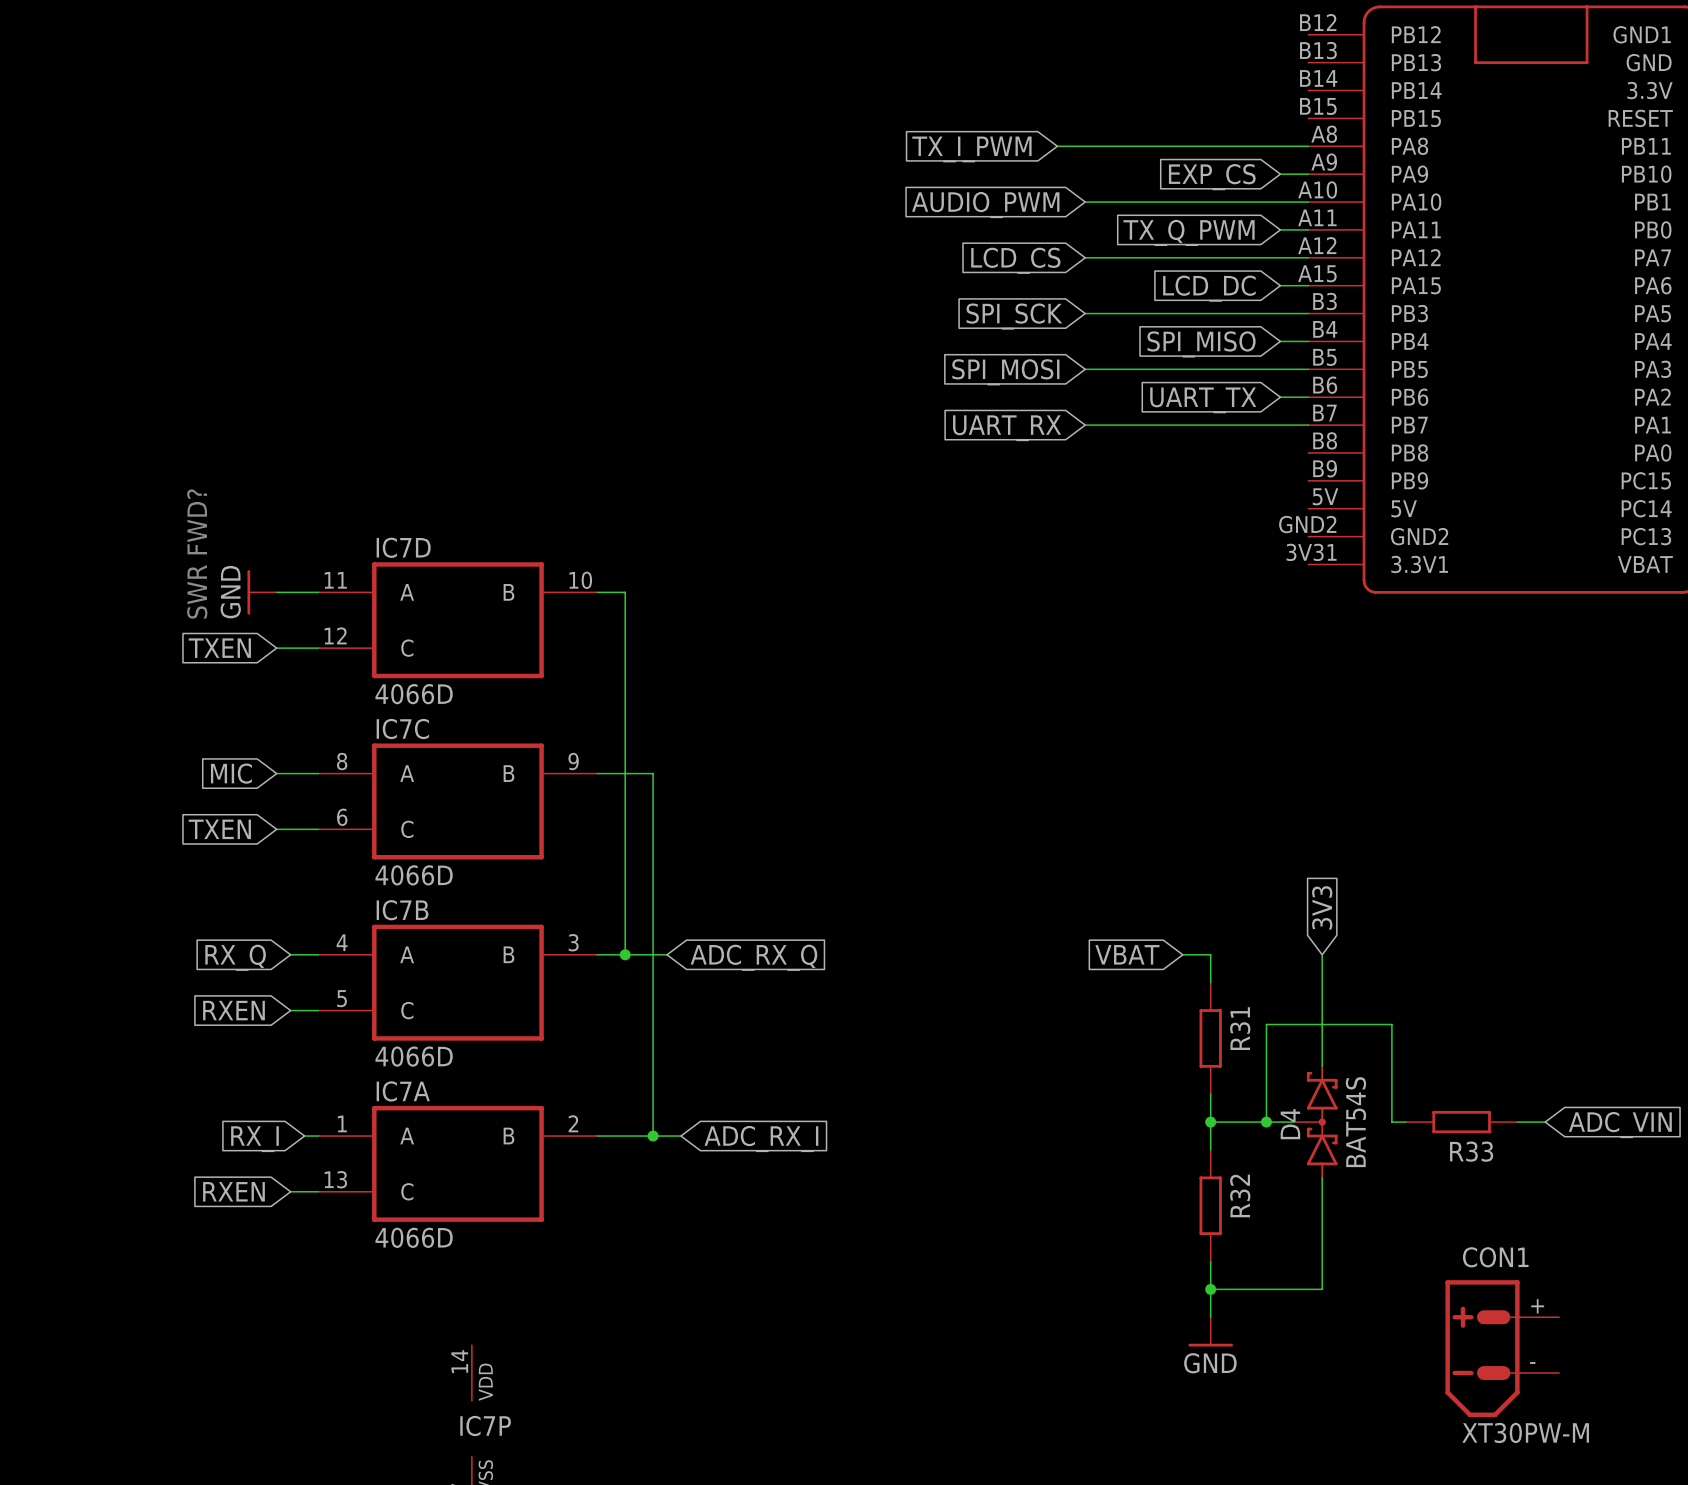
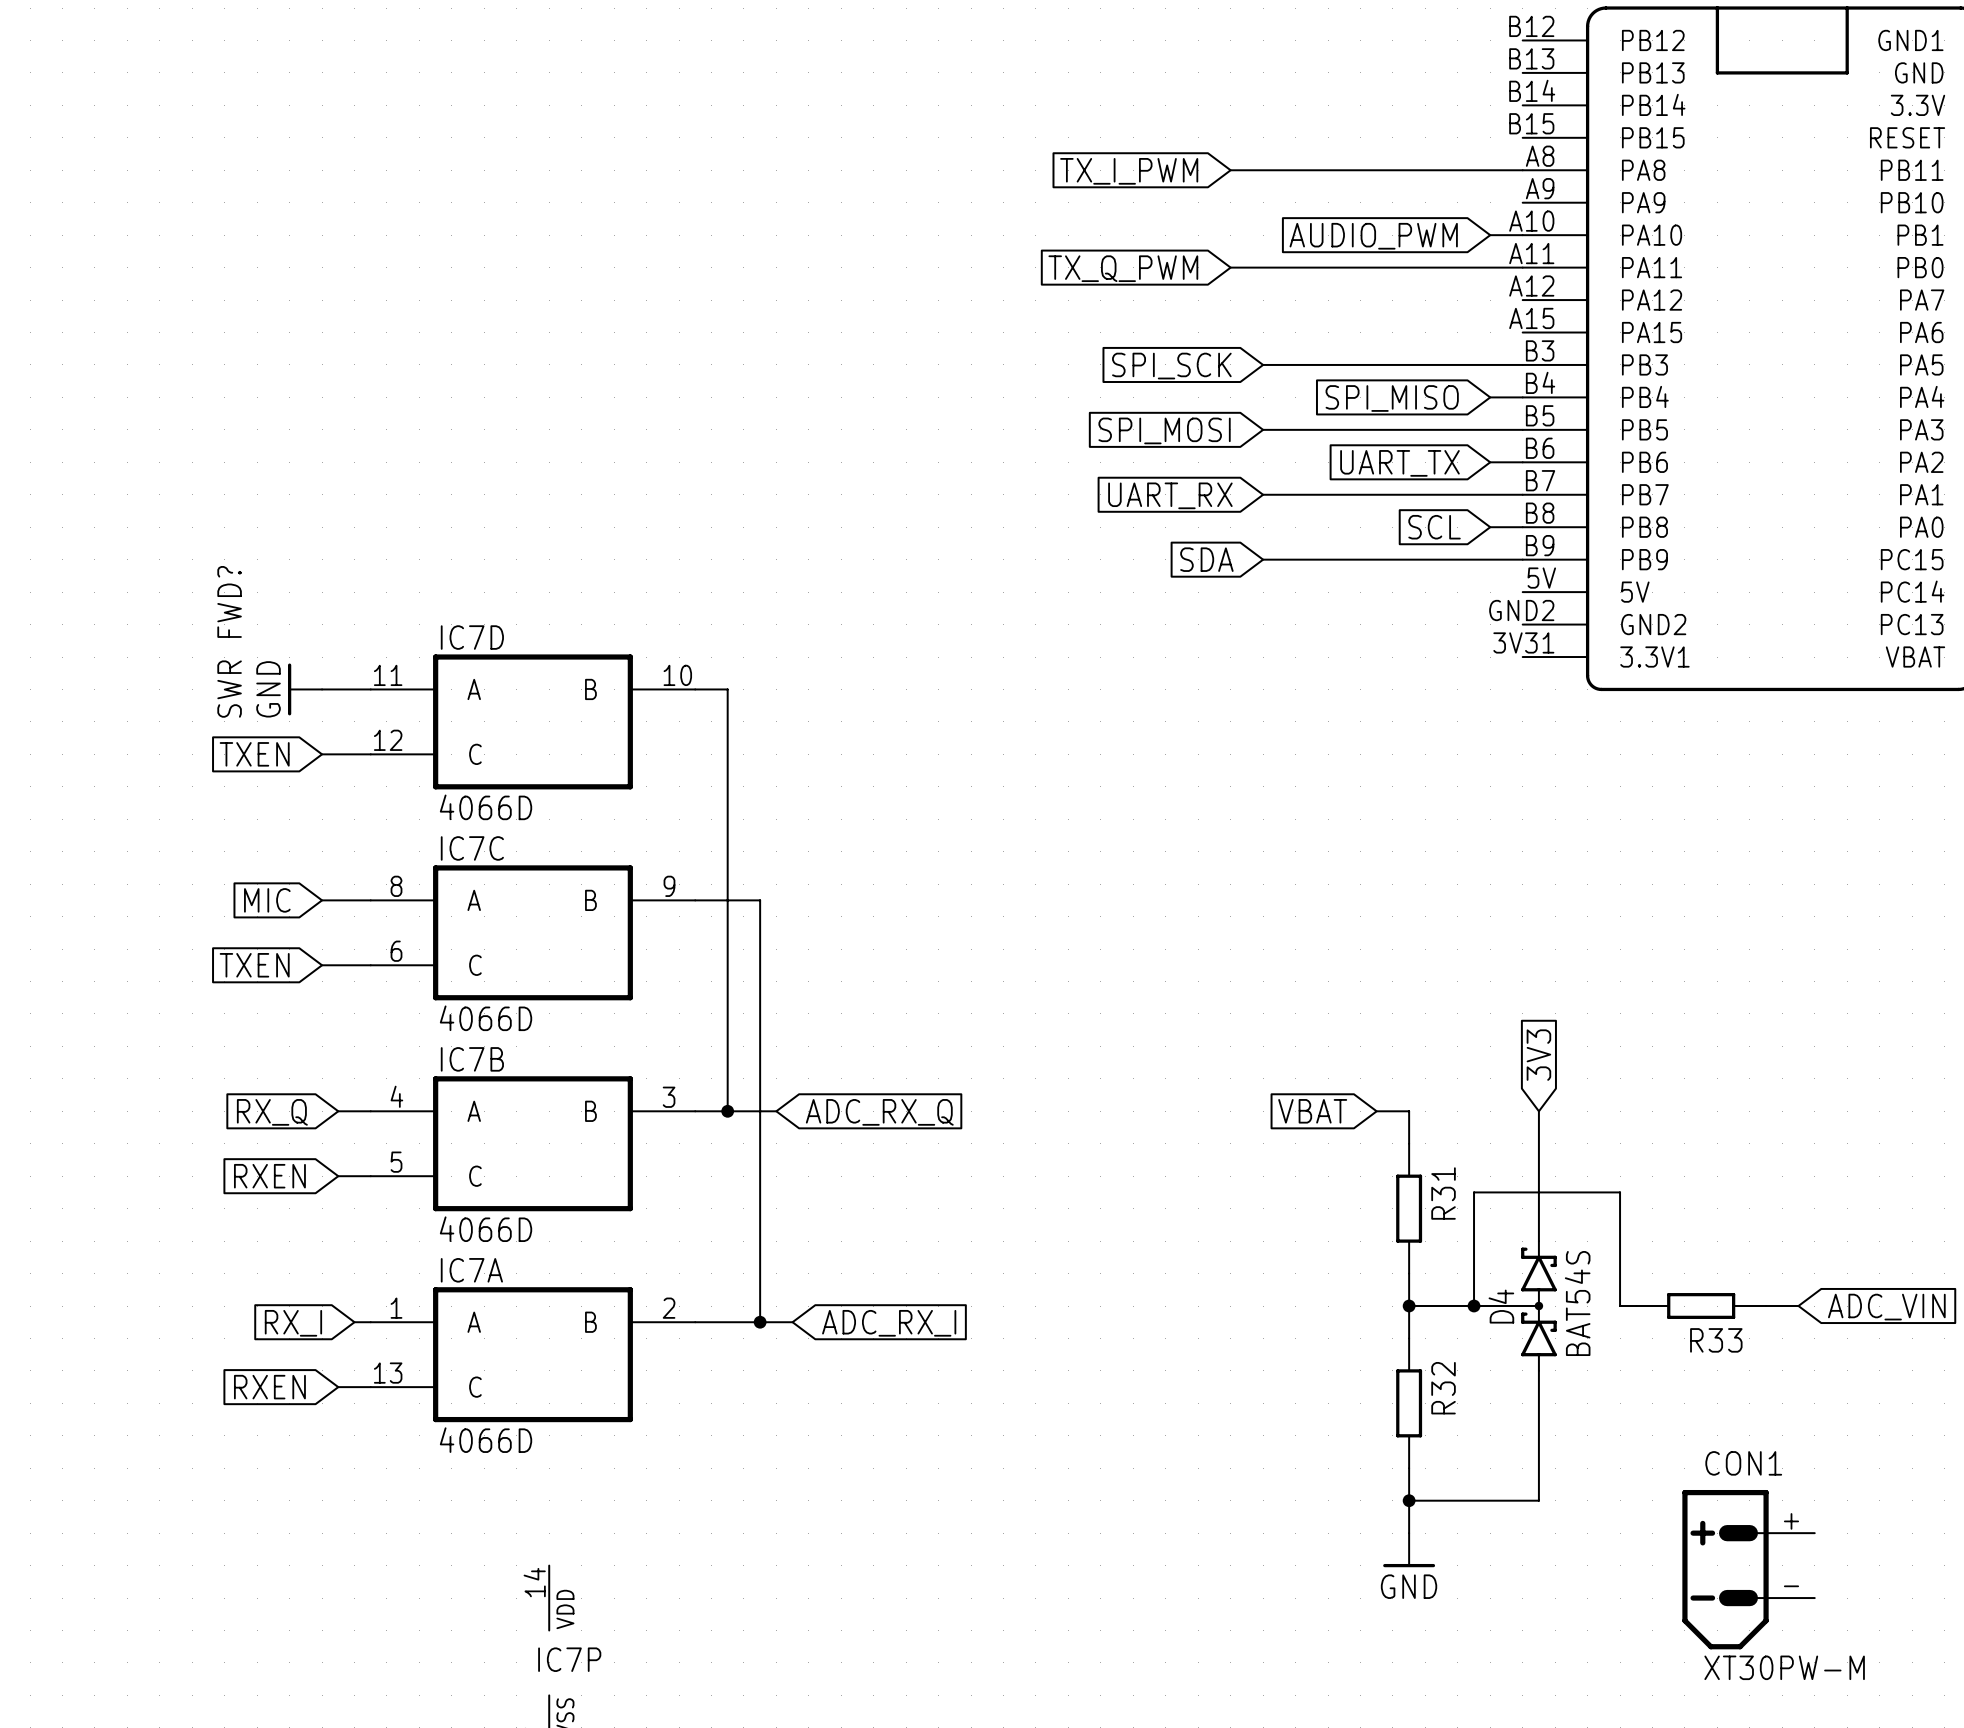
wire: (1280, 174) (1308, 174) -> none
global label: EXP_CS (1212, 177) -> none
wire: (1085, 202) (1280, 202) -> none
global label position: AUDIO_PWM (985, 205) -> AUDIO_PWM (1373, 236)
global label position: TX_Q_PWM (1189, 232) -> TX_Q_PWM (1123, 268)
wire: (1085, 257) (1308, 257) -> (1230, 267) (1490, 267)
global label: LCD_CS (1015, 260) -> none
wire: (1280, 285) (1308, 285) -> (1490, 527) (1522, 527)
global label: LCD_DC (1209, 288) -> none
global label: none -> SCL (1434, 527)
global label: none -> SDA (1206, 559)
wire: none -> (1263, 559) (1522, 559)

